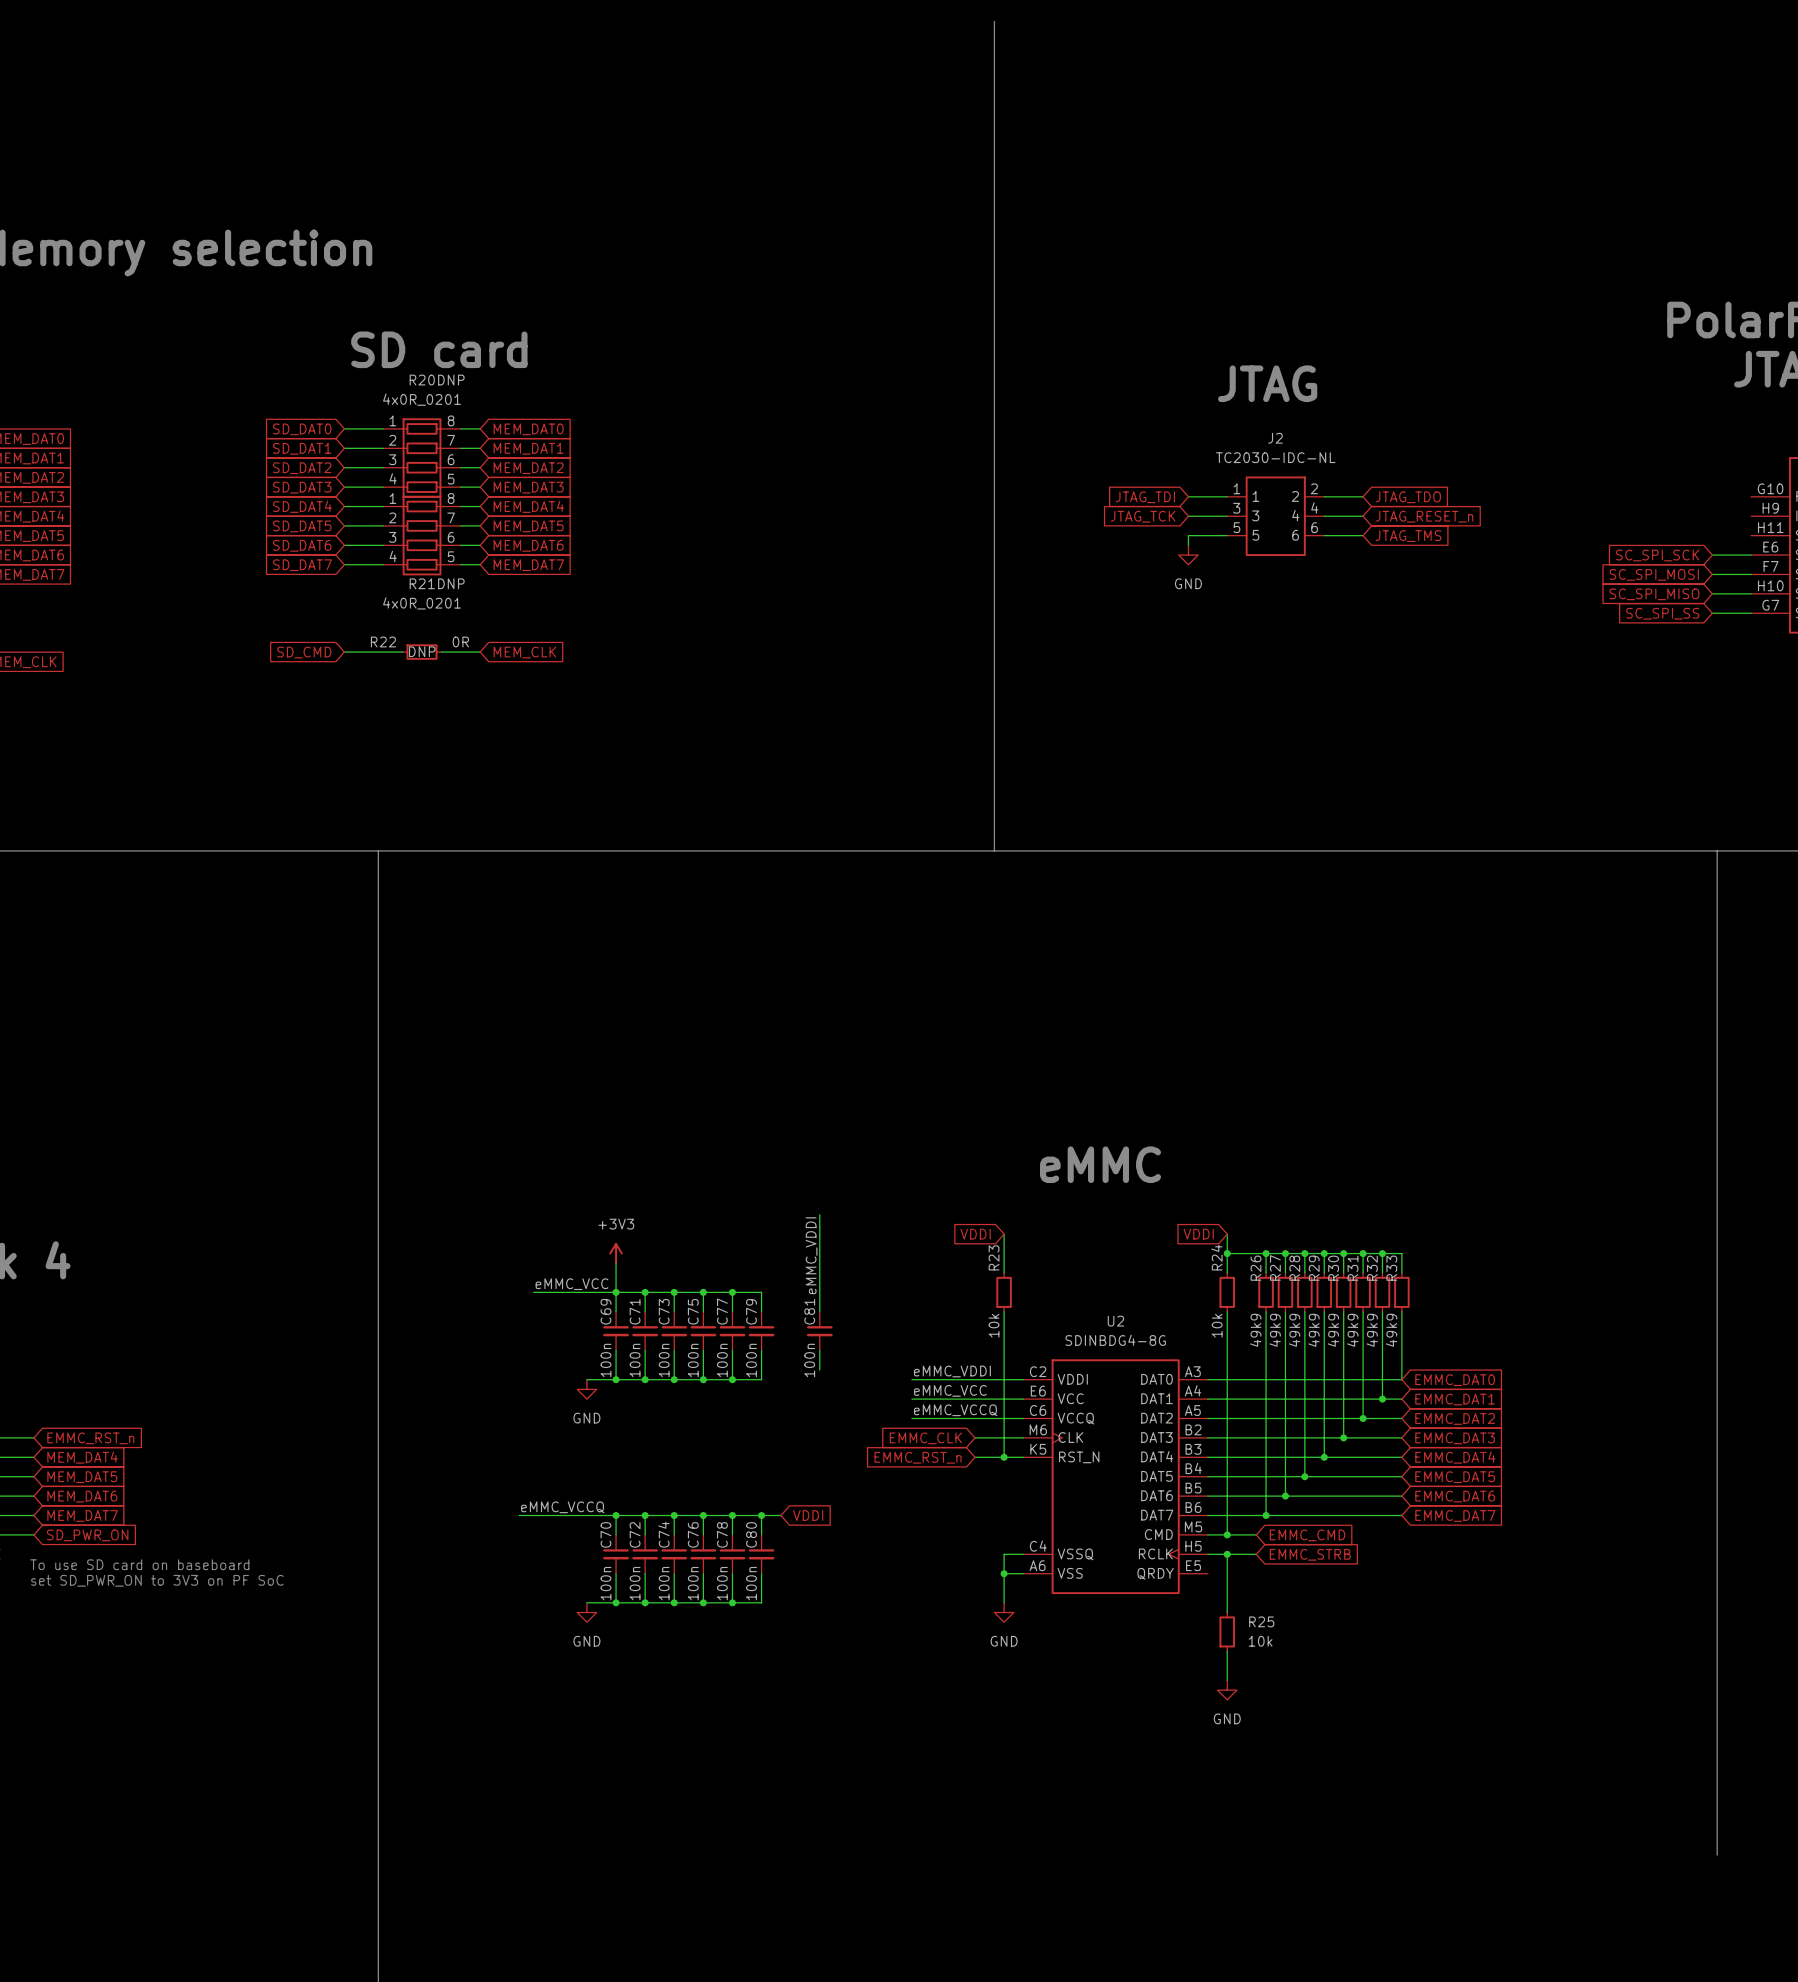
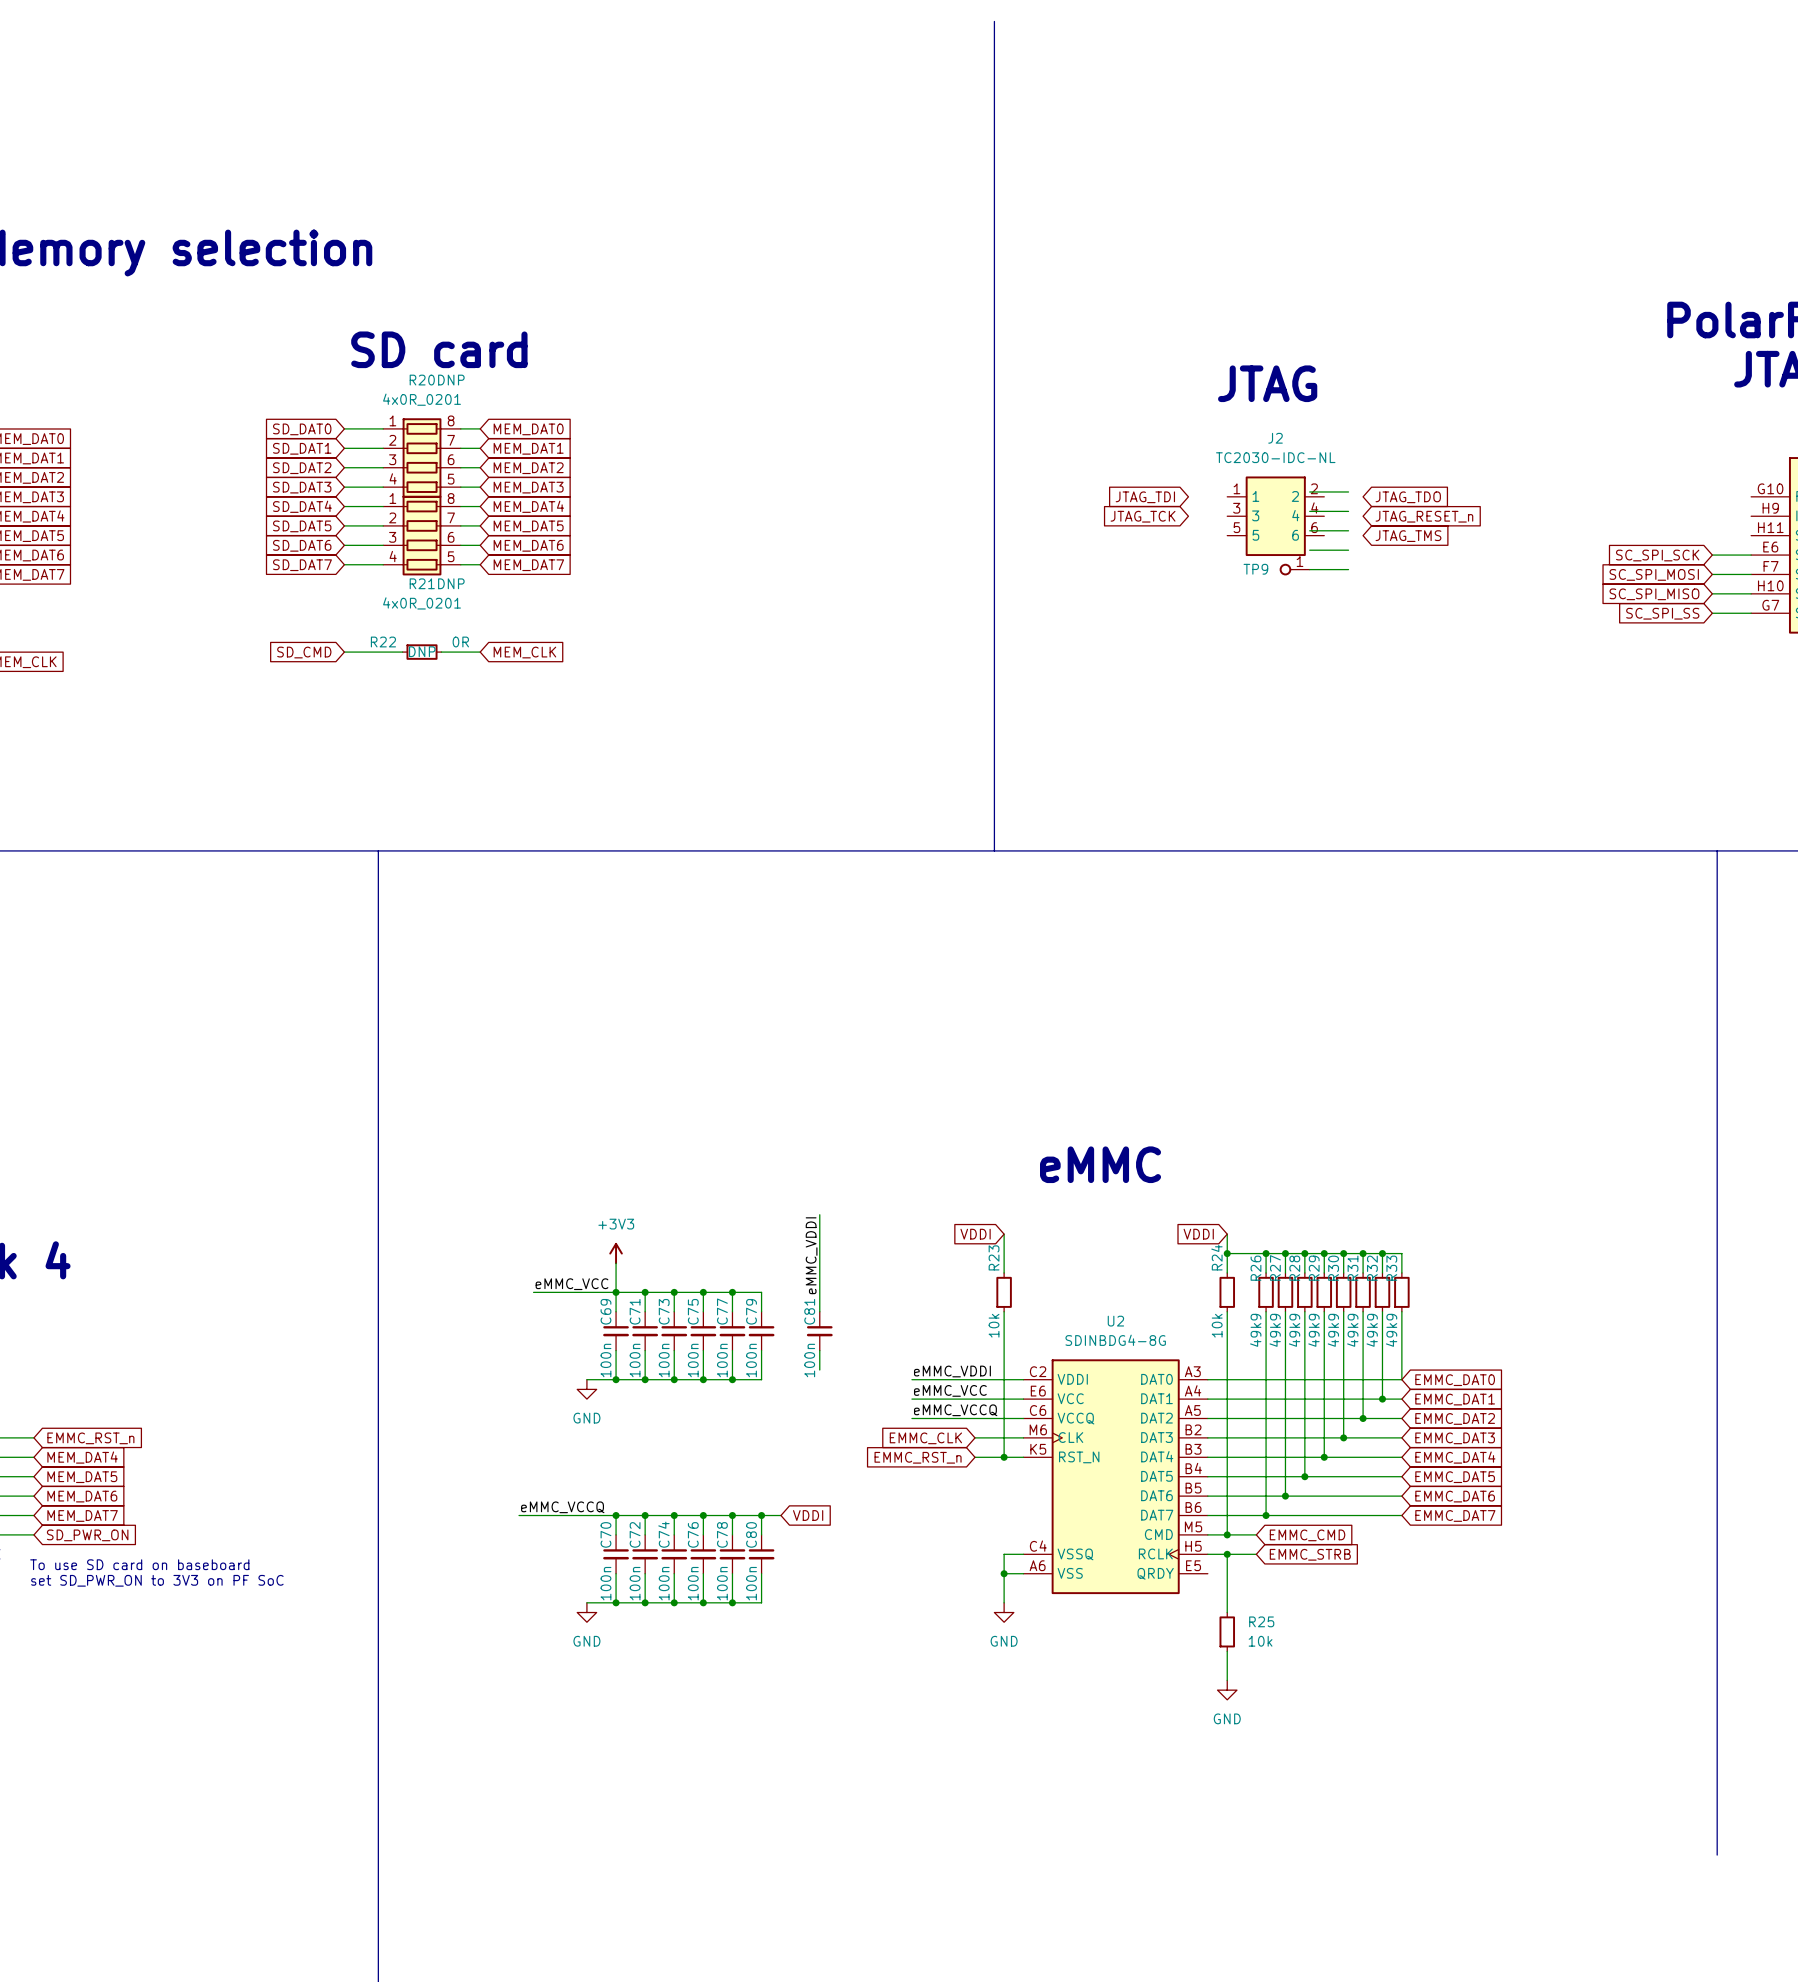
wire: (1188, 496) (1227, 496) -> (1309, 569) (1348, 569)
wire: (1324, 496) (1363, 496) -> (1309, 491) (1348, 491)
wire: (1188, 516) (1227, 516) -> (1309, 550) (1348, 550)
wire: (1324, 516) (1363, 516) -> (1309, 511) (1348, 511)
wire: (1227, 535) (1188, 535) (1188, 545) -> none
wire: (1324, 535) (1363, 535) -> (1309, 530) (1348, 530)
power symbol: GND (1188, 555) -> none
TP9: none -> (1294, 569)

